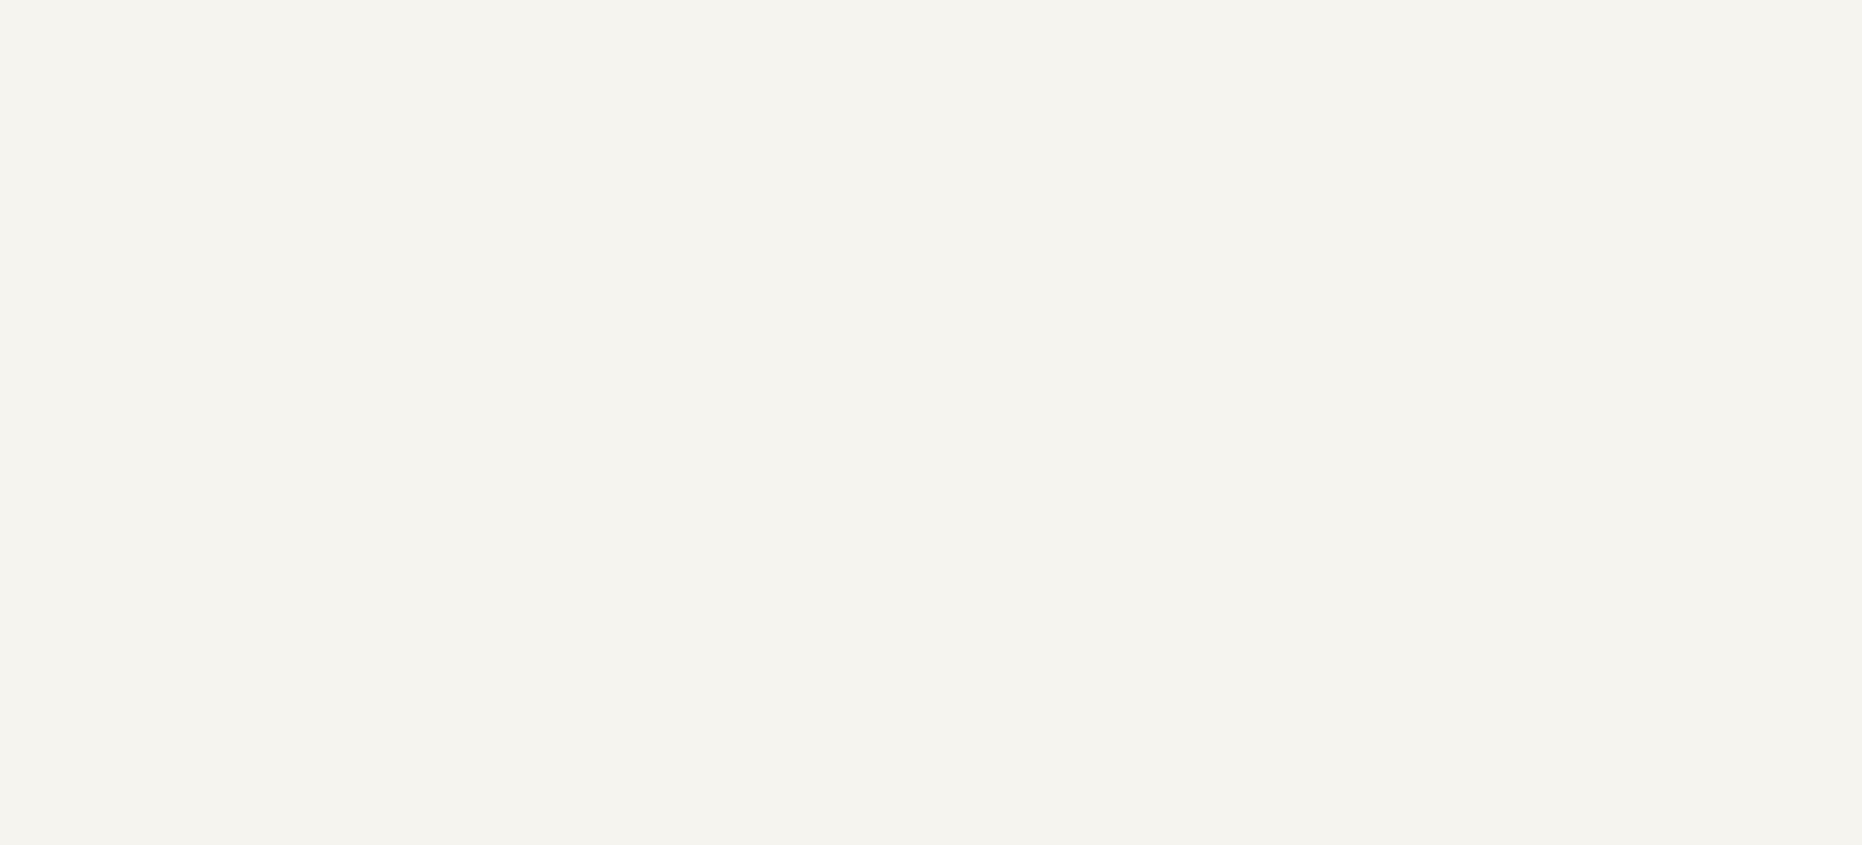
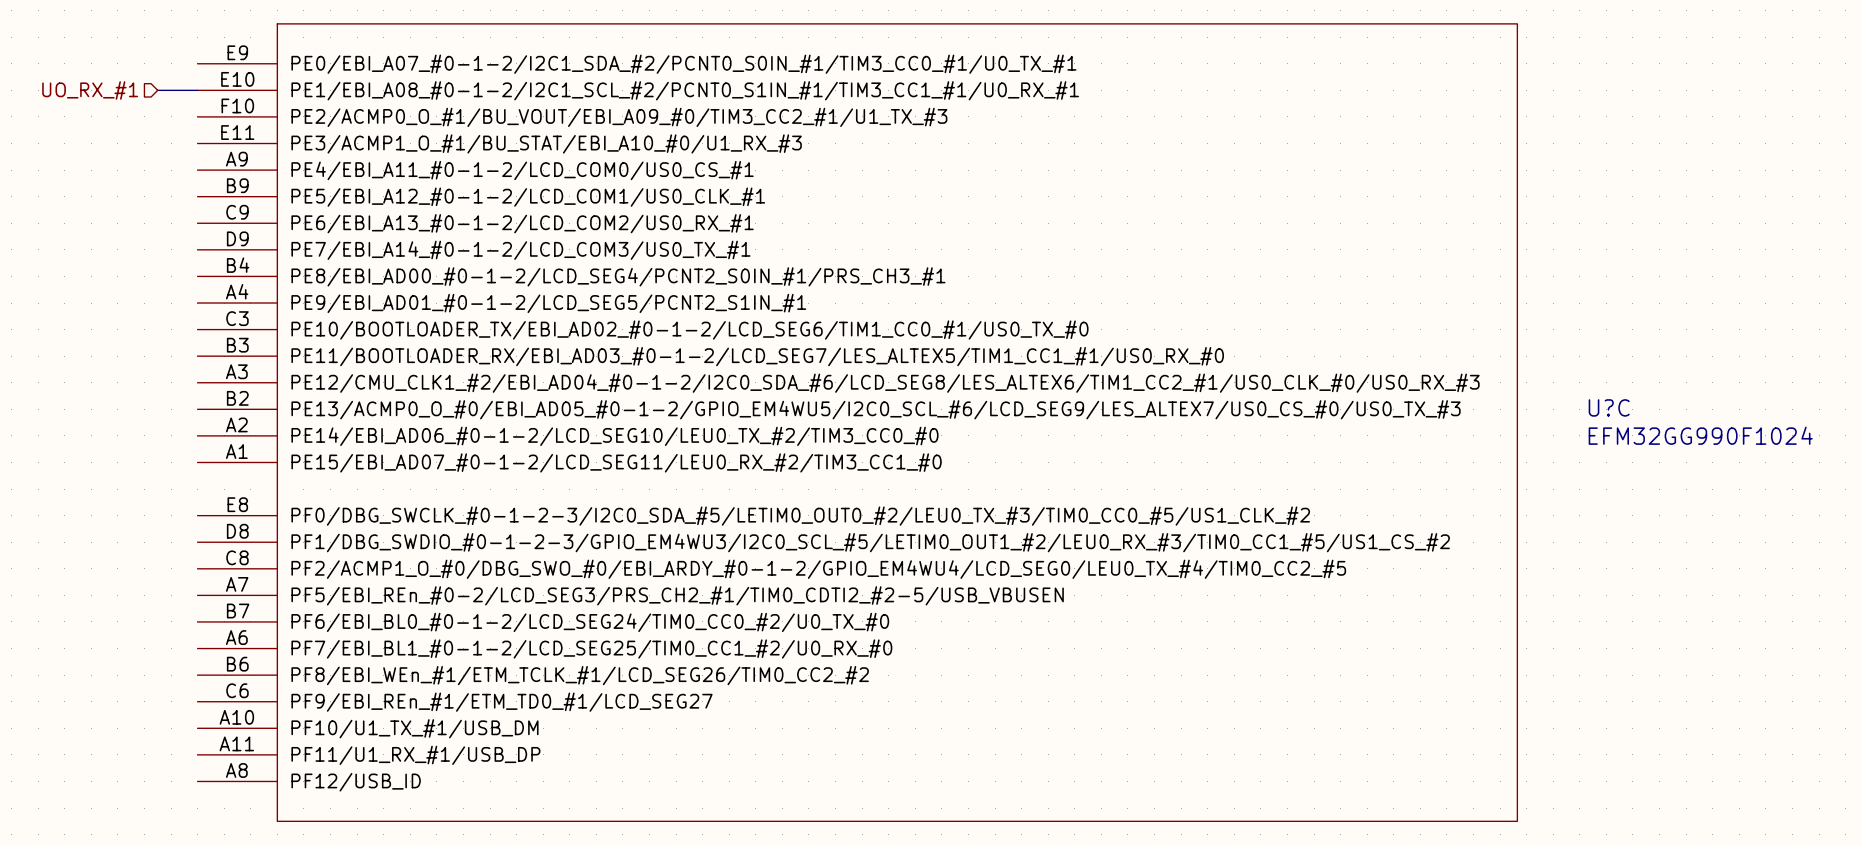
wire: none -> (157, 90) (197, 90)
hierarchical label: none -> UO_RX_#1 (90, 90)
U?C: none -> EFM32GG990F1024 (857, 422)

